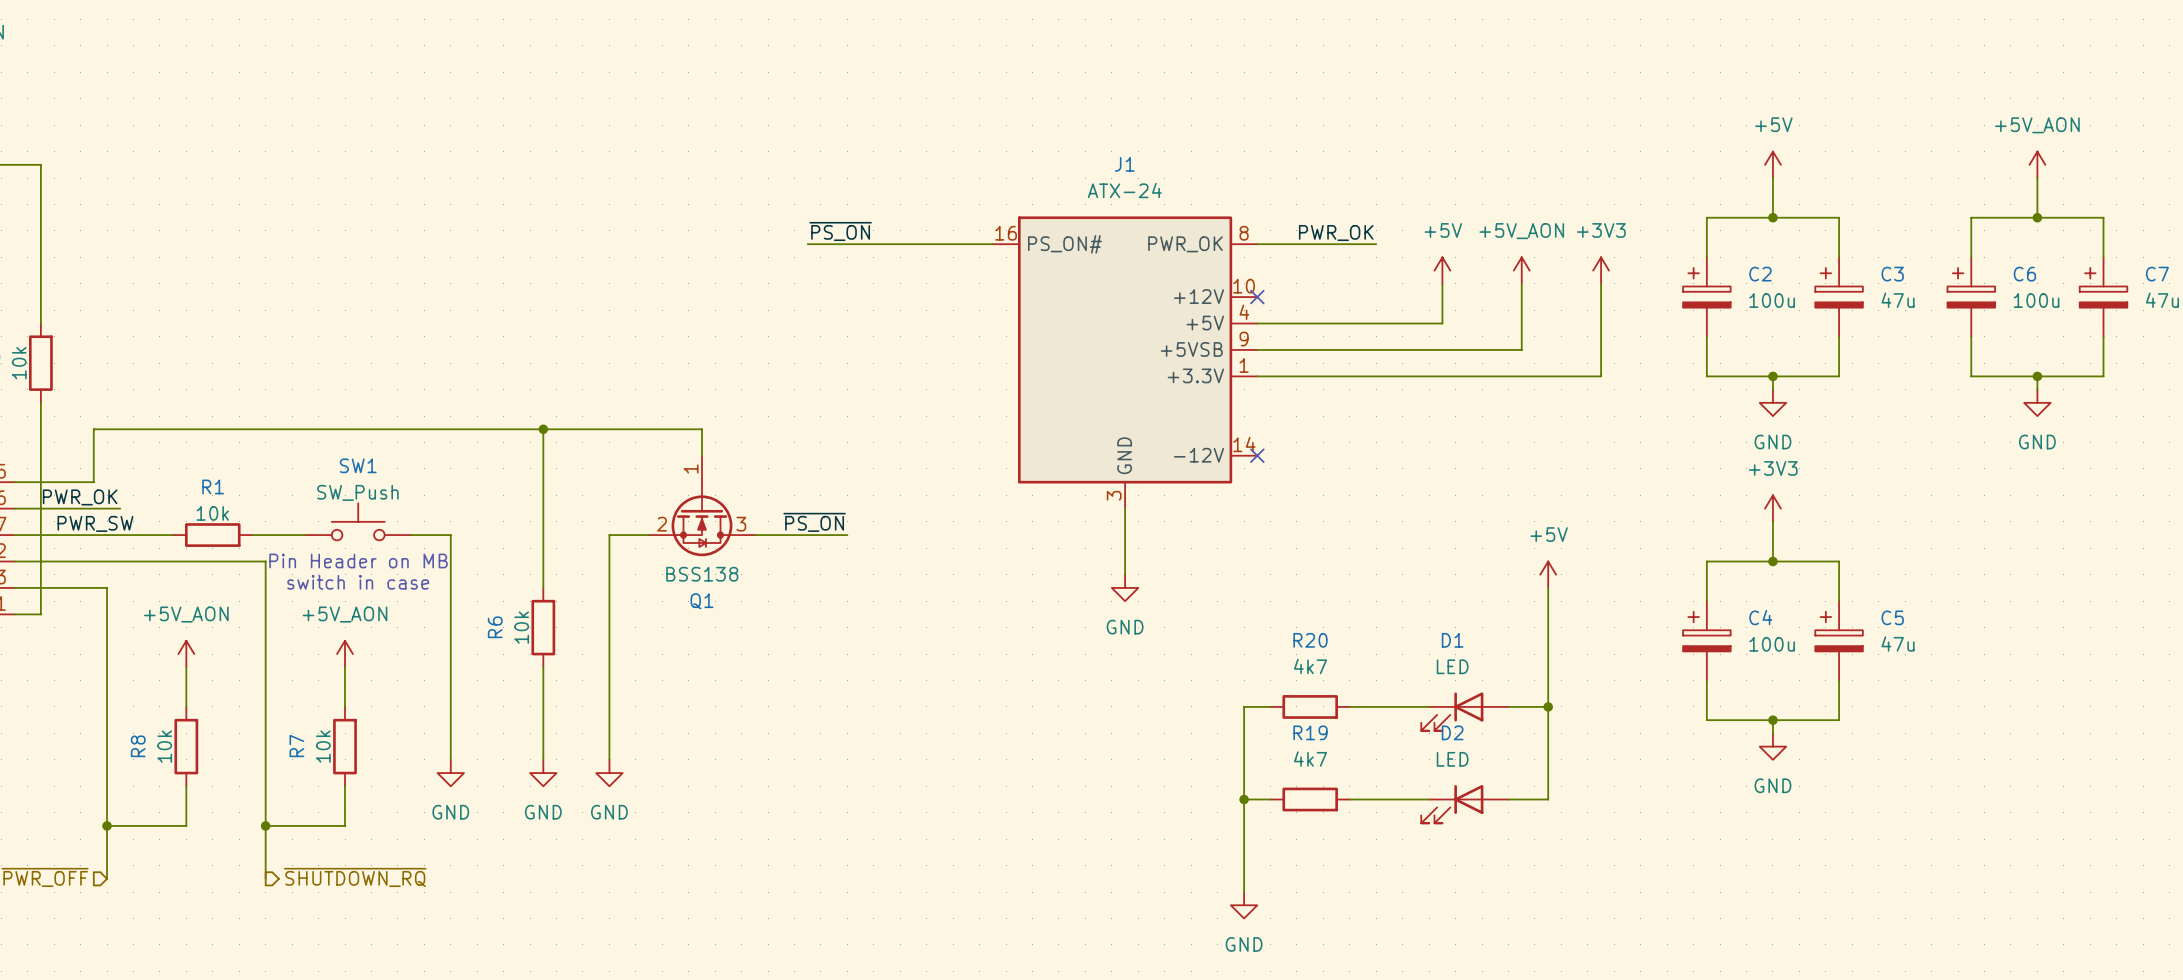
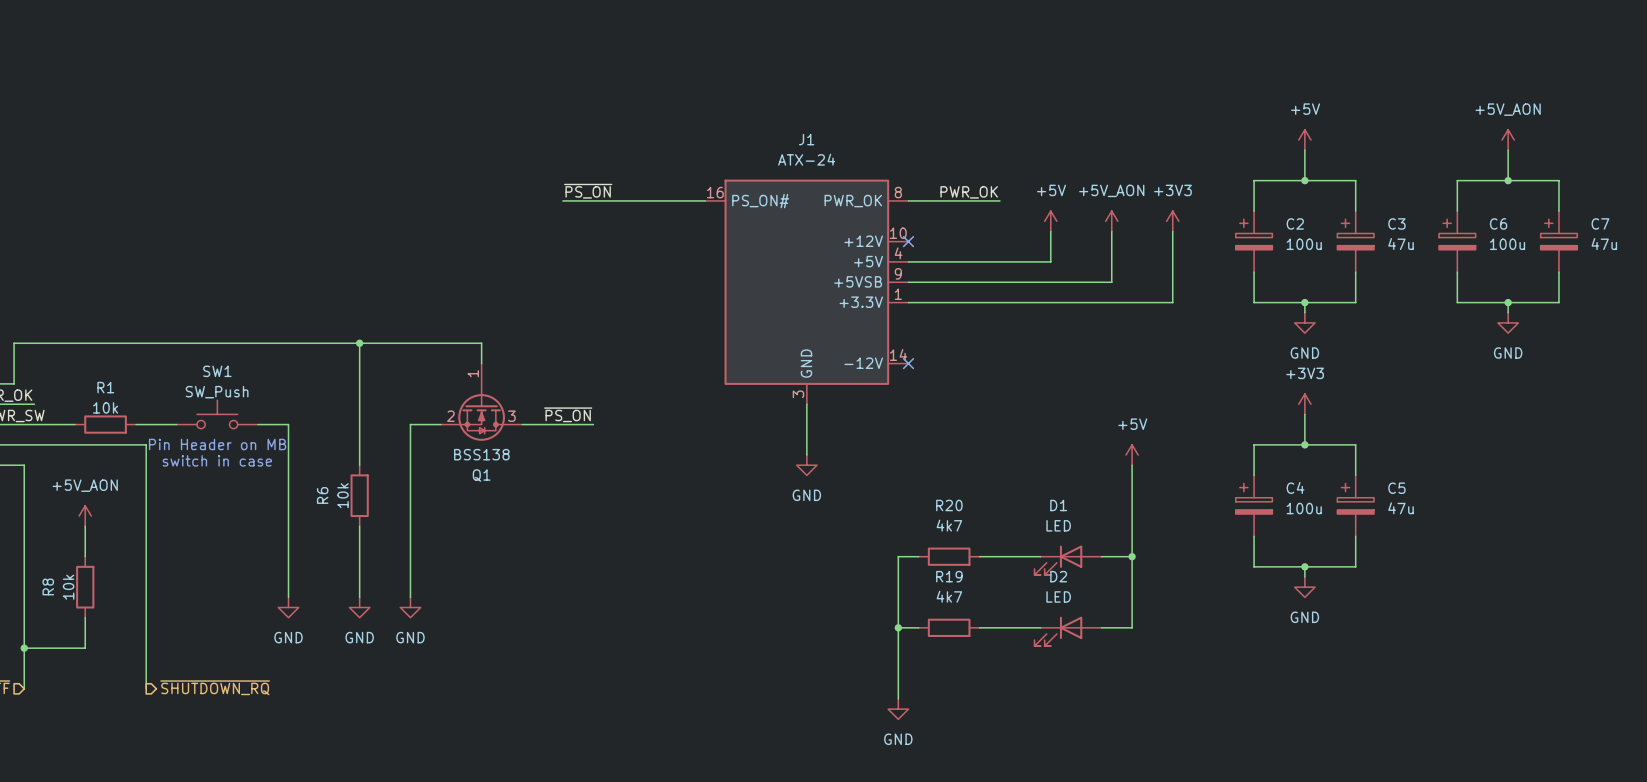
power symbol: +5V_AON (345, 654) -> none
wire: (345, 667) (345, 706) -> none
R7: 10k (345, 746) -> none
wire: (345, 786) (345, 825) (265, 825) -> none
junction: (265, 825) -> none

